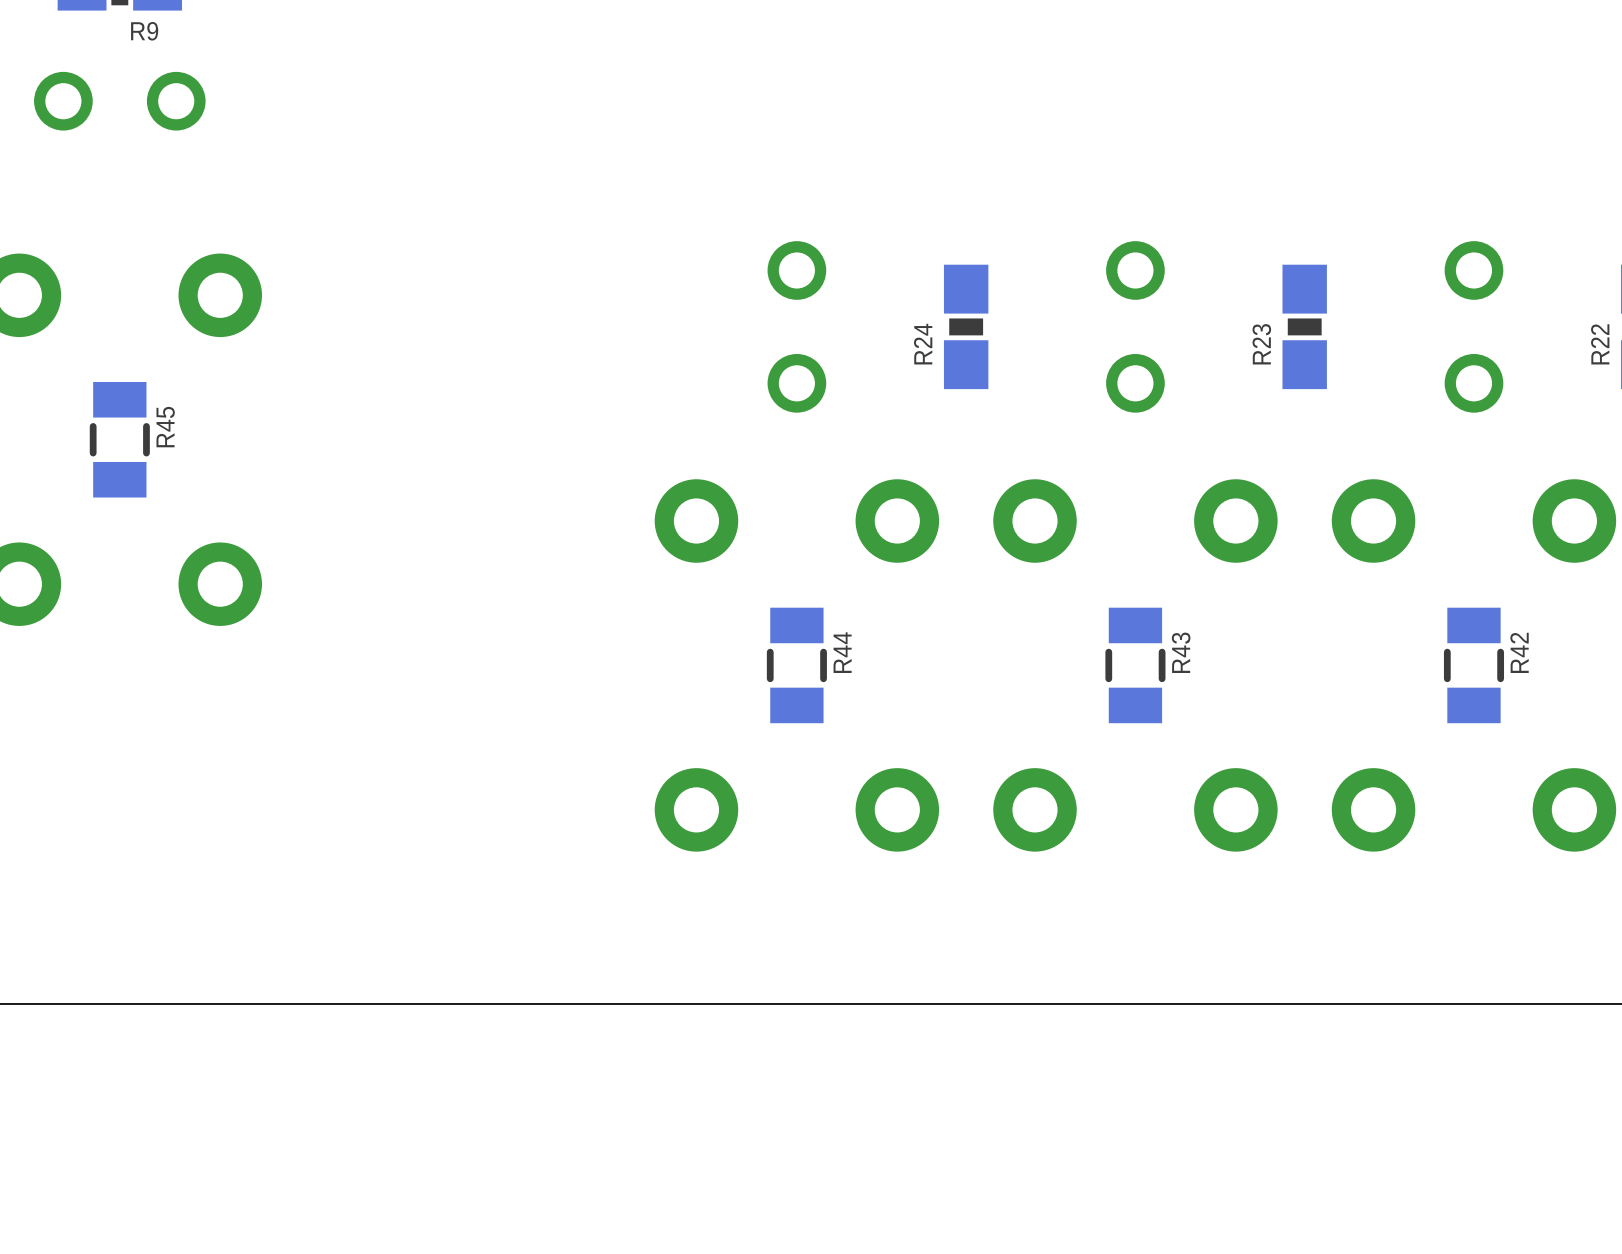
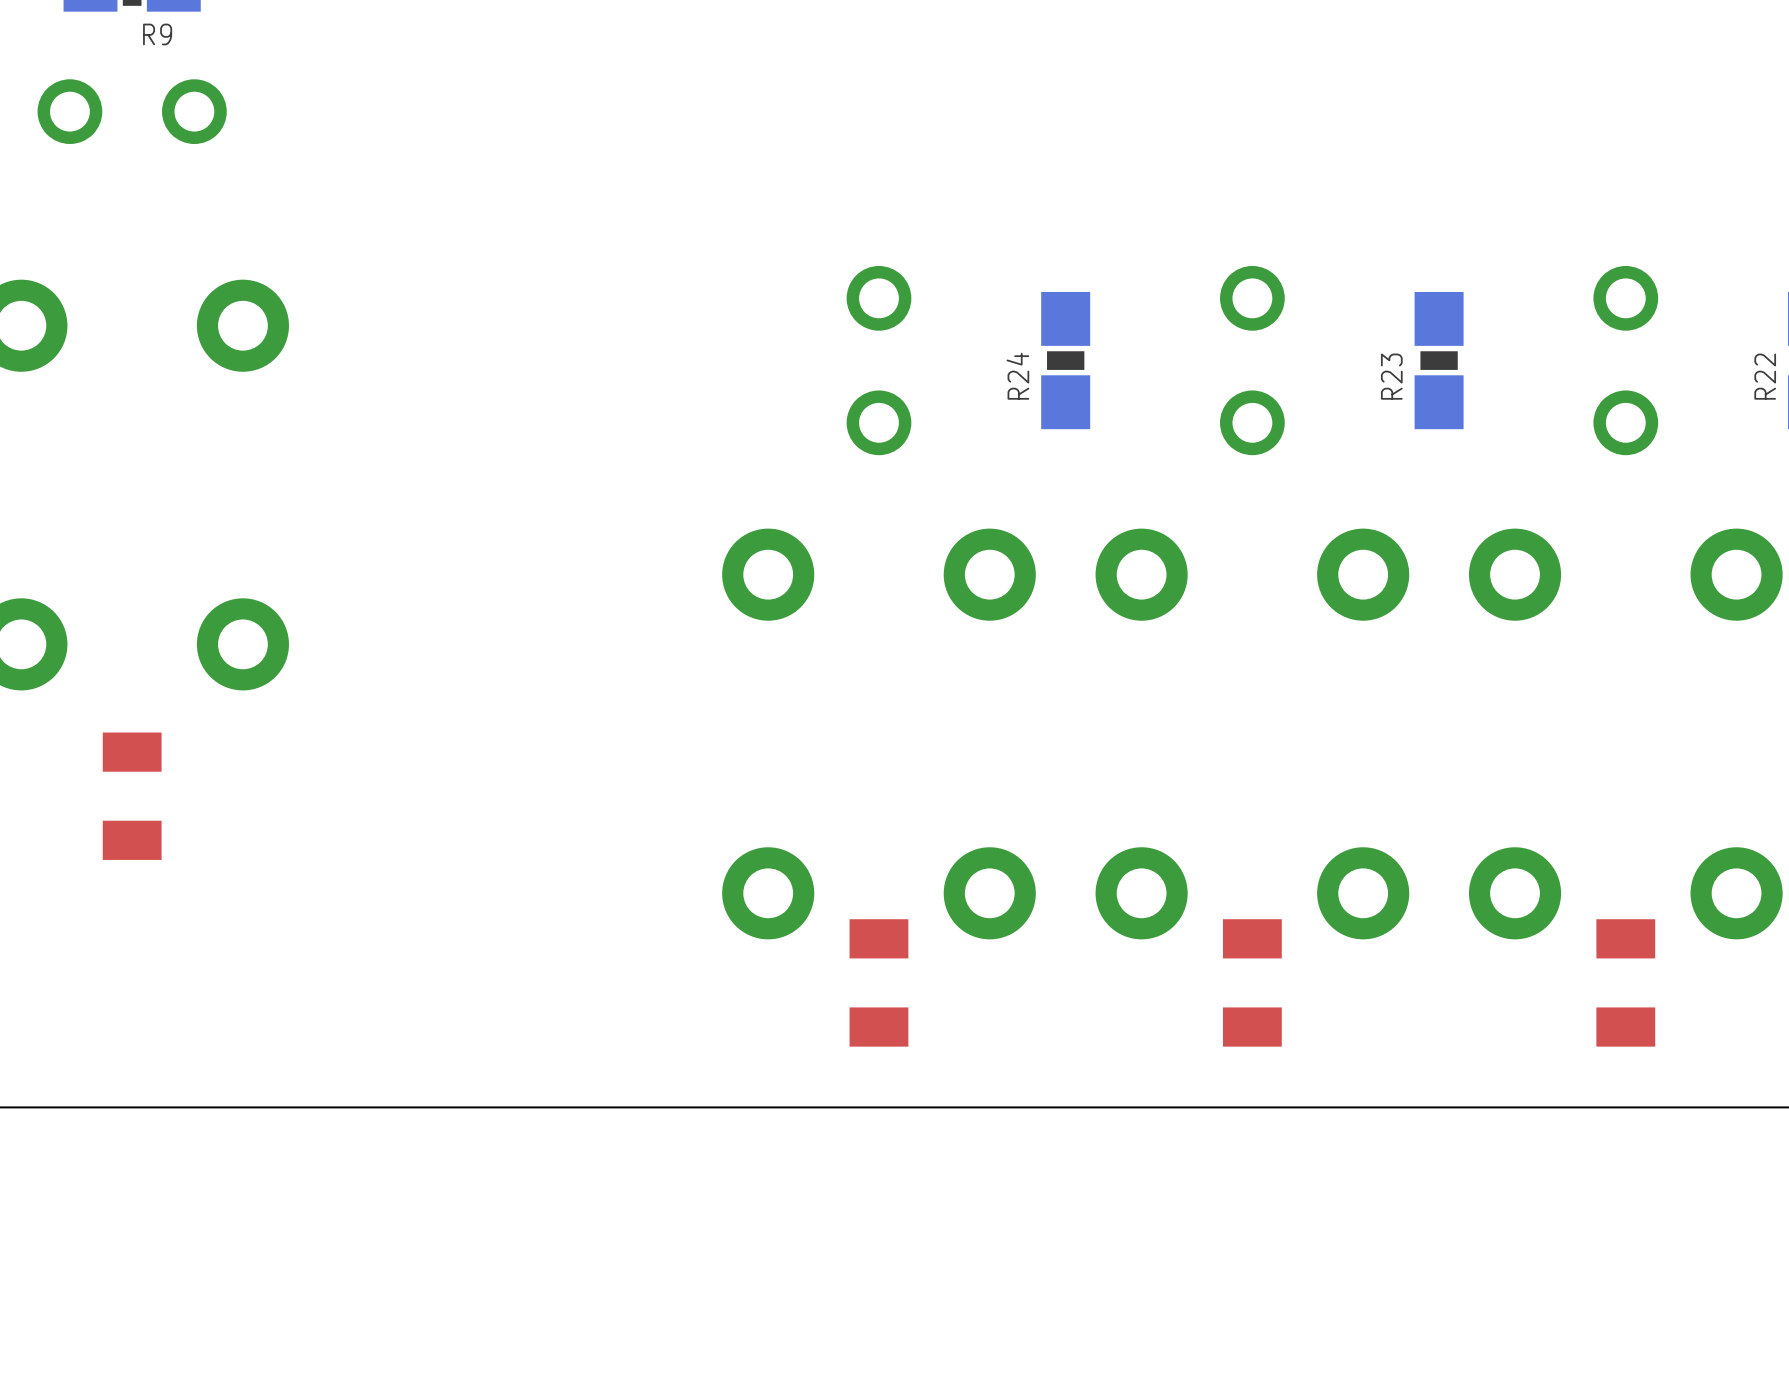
R45 side: bottom (119, 439) -> top (132, 796)
R44 side: bottom (796, 665) -> top (878, 982)
R43 side: bottom (1135, 665) -> top (1252, 982)
R42 side: bottom (1473, 665) -> top (1625, 982)

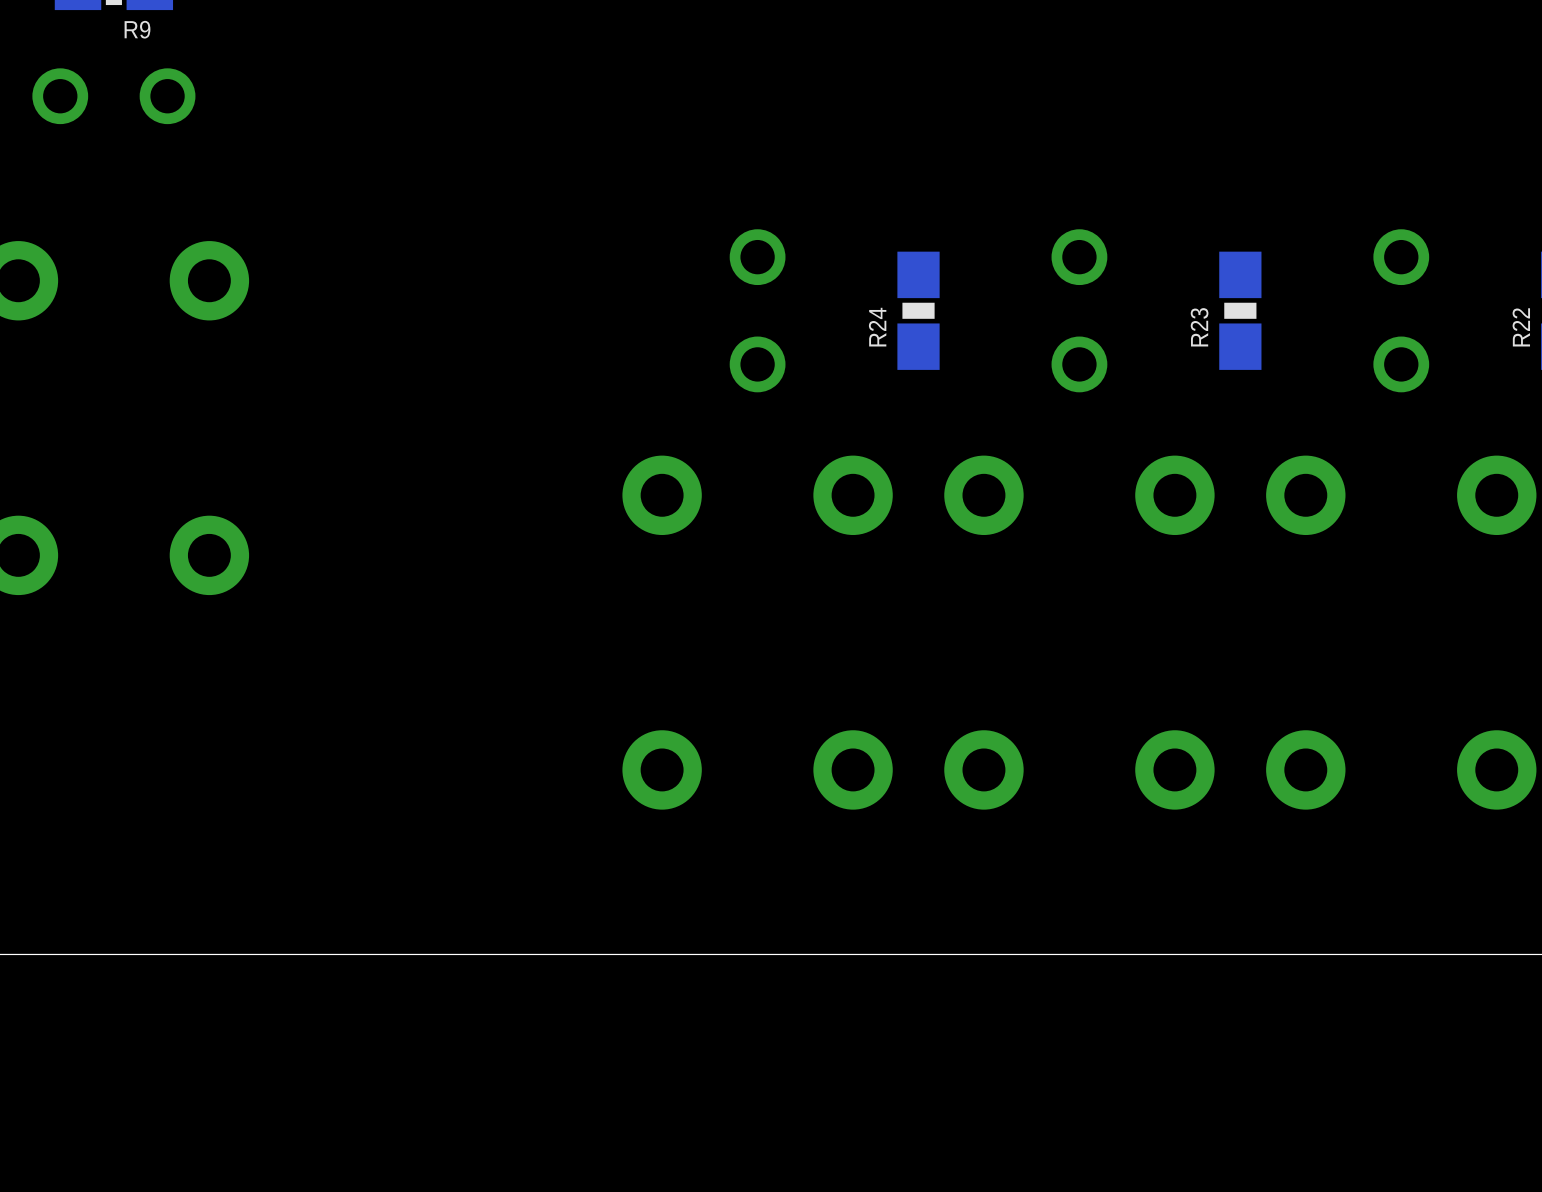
part: (132, 796) -> none
part: (878, 982) -> none
part: (1252, 982) -> none
part: (1625, 982) -> none

